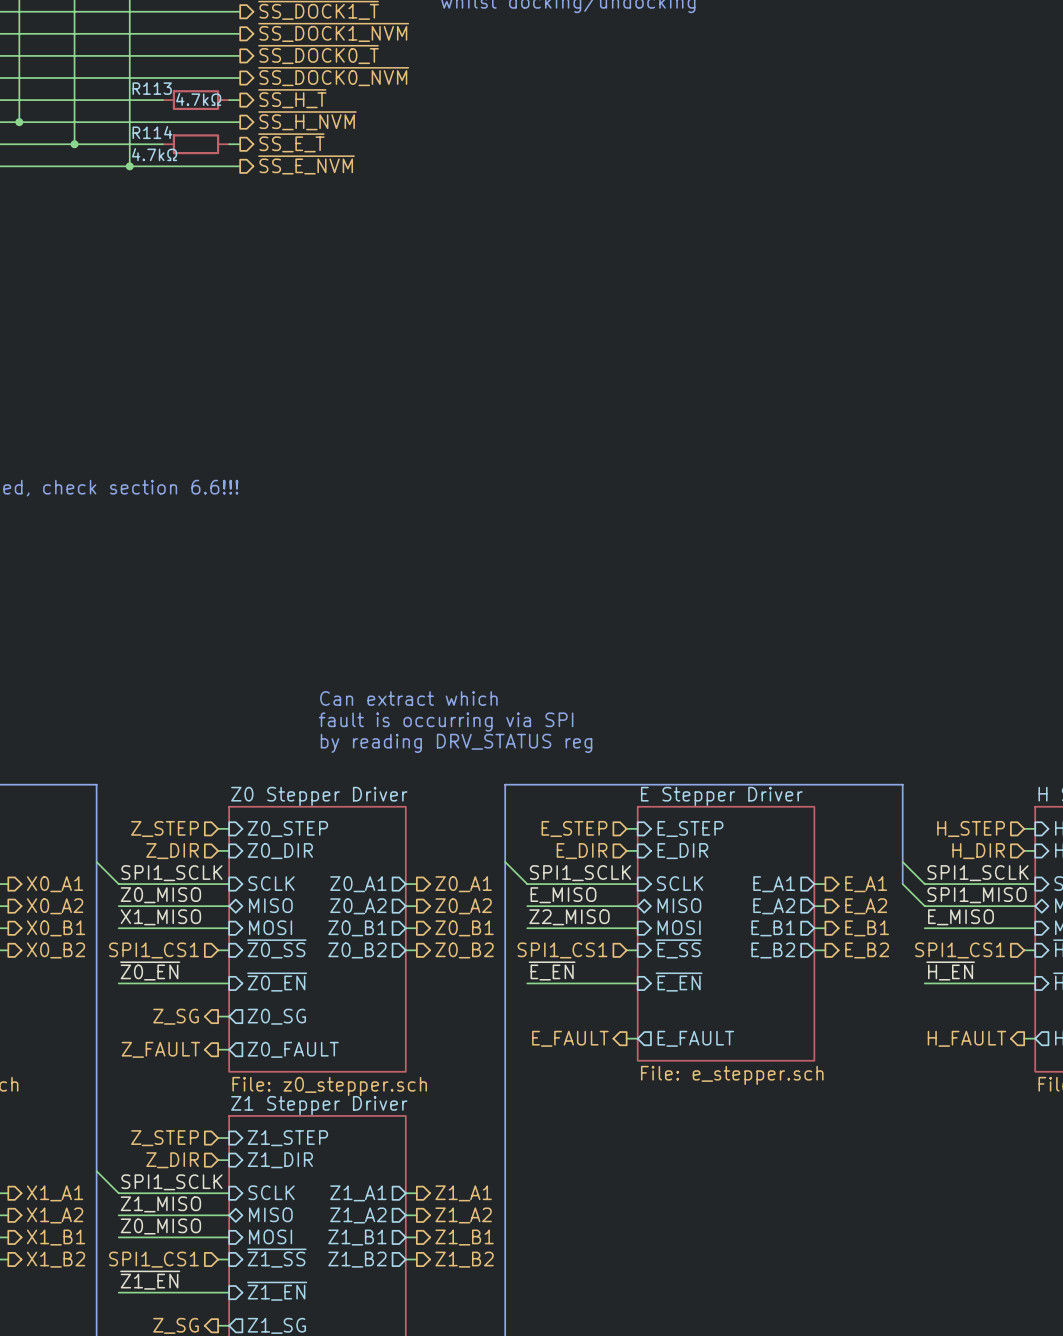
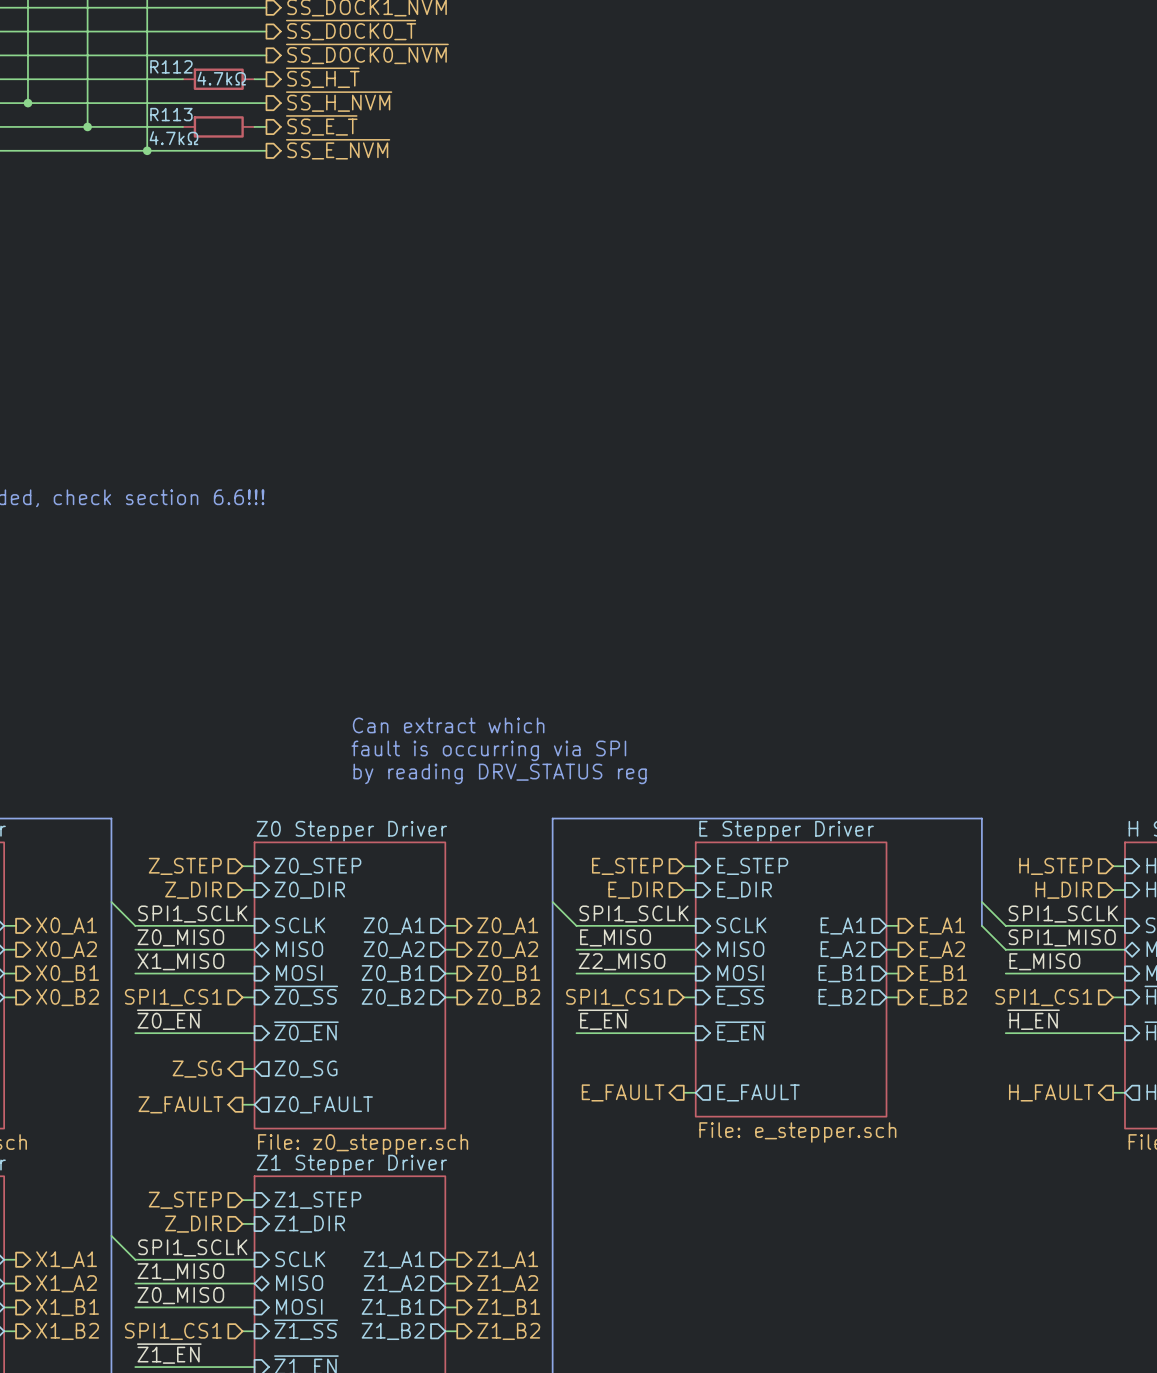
R113 name: R113 (152, 88) -> R112 (171, 66)
R114 name: R114 (152, 132) -> R113 (171, 114)

